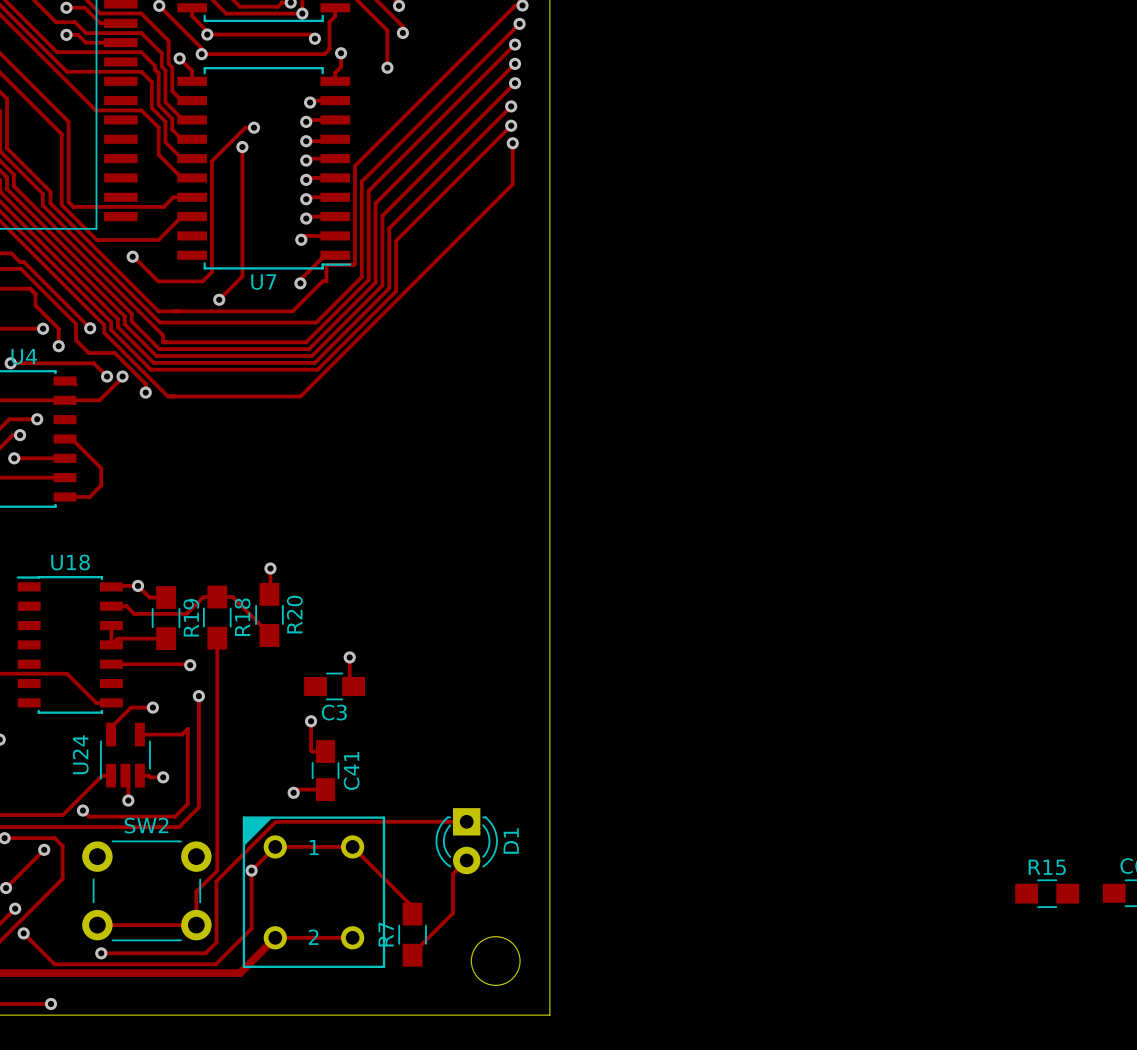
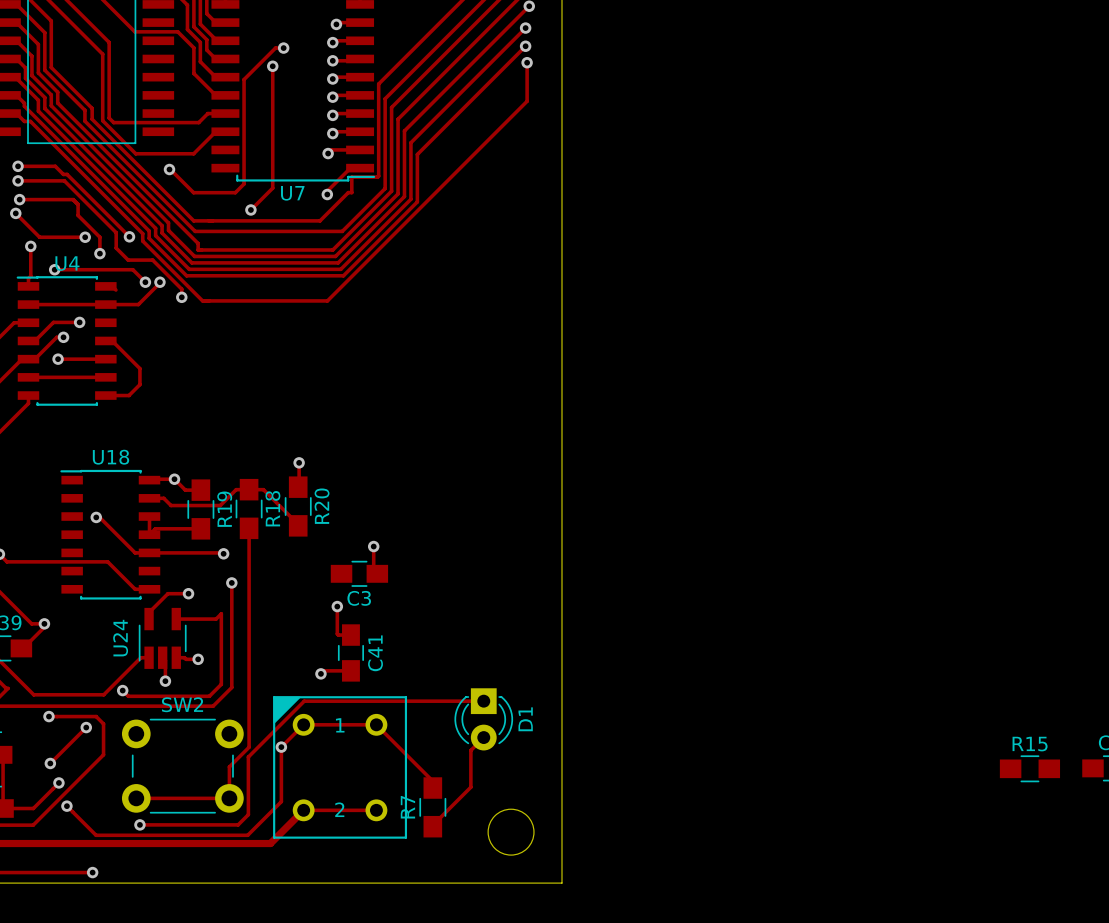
track: none -> (96, 517) (99, 517) (135, 552) (149, 552)
via: none -> (96, 517)

